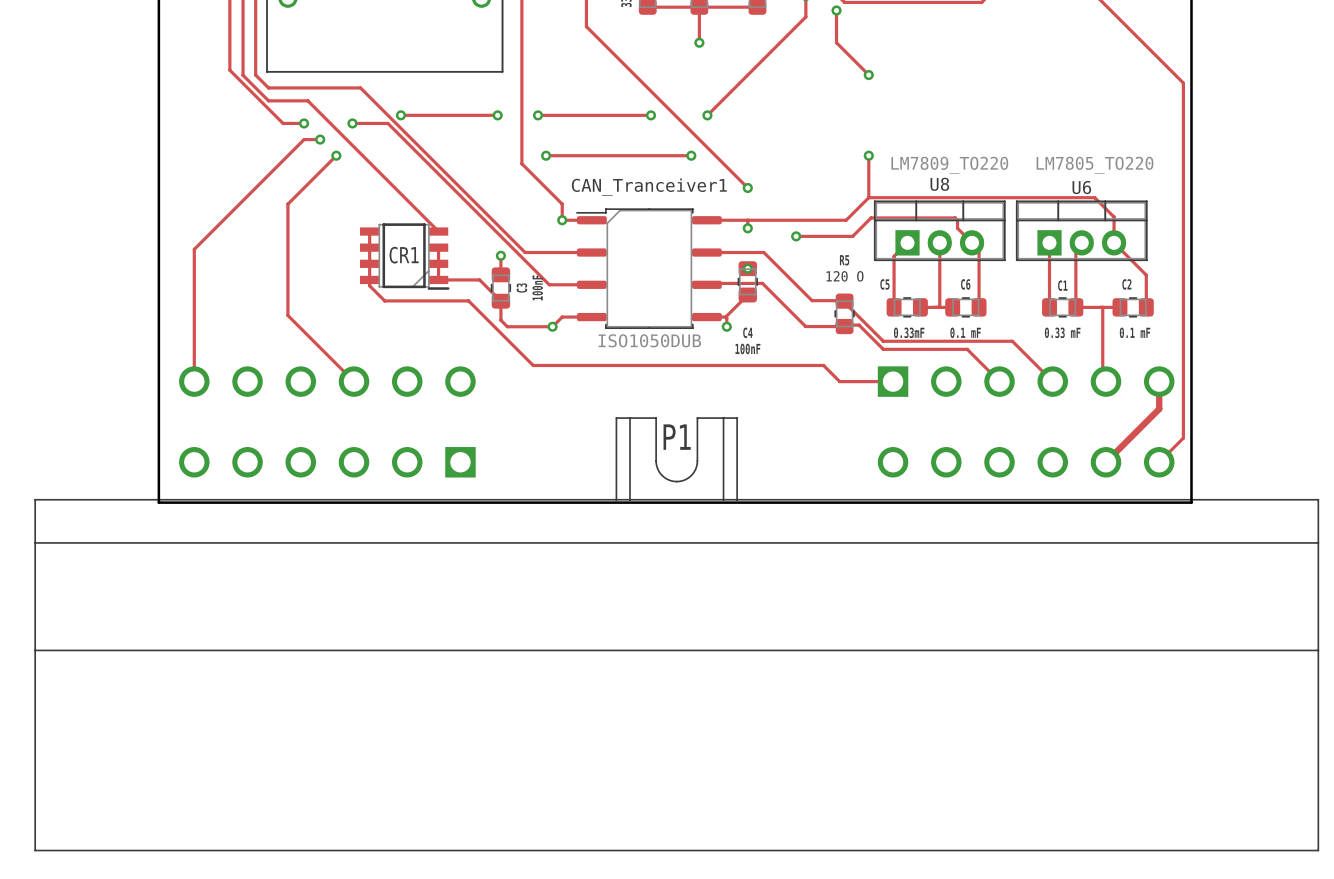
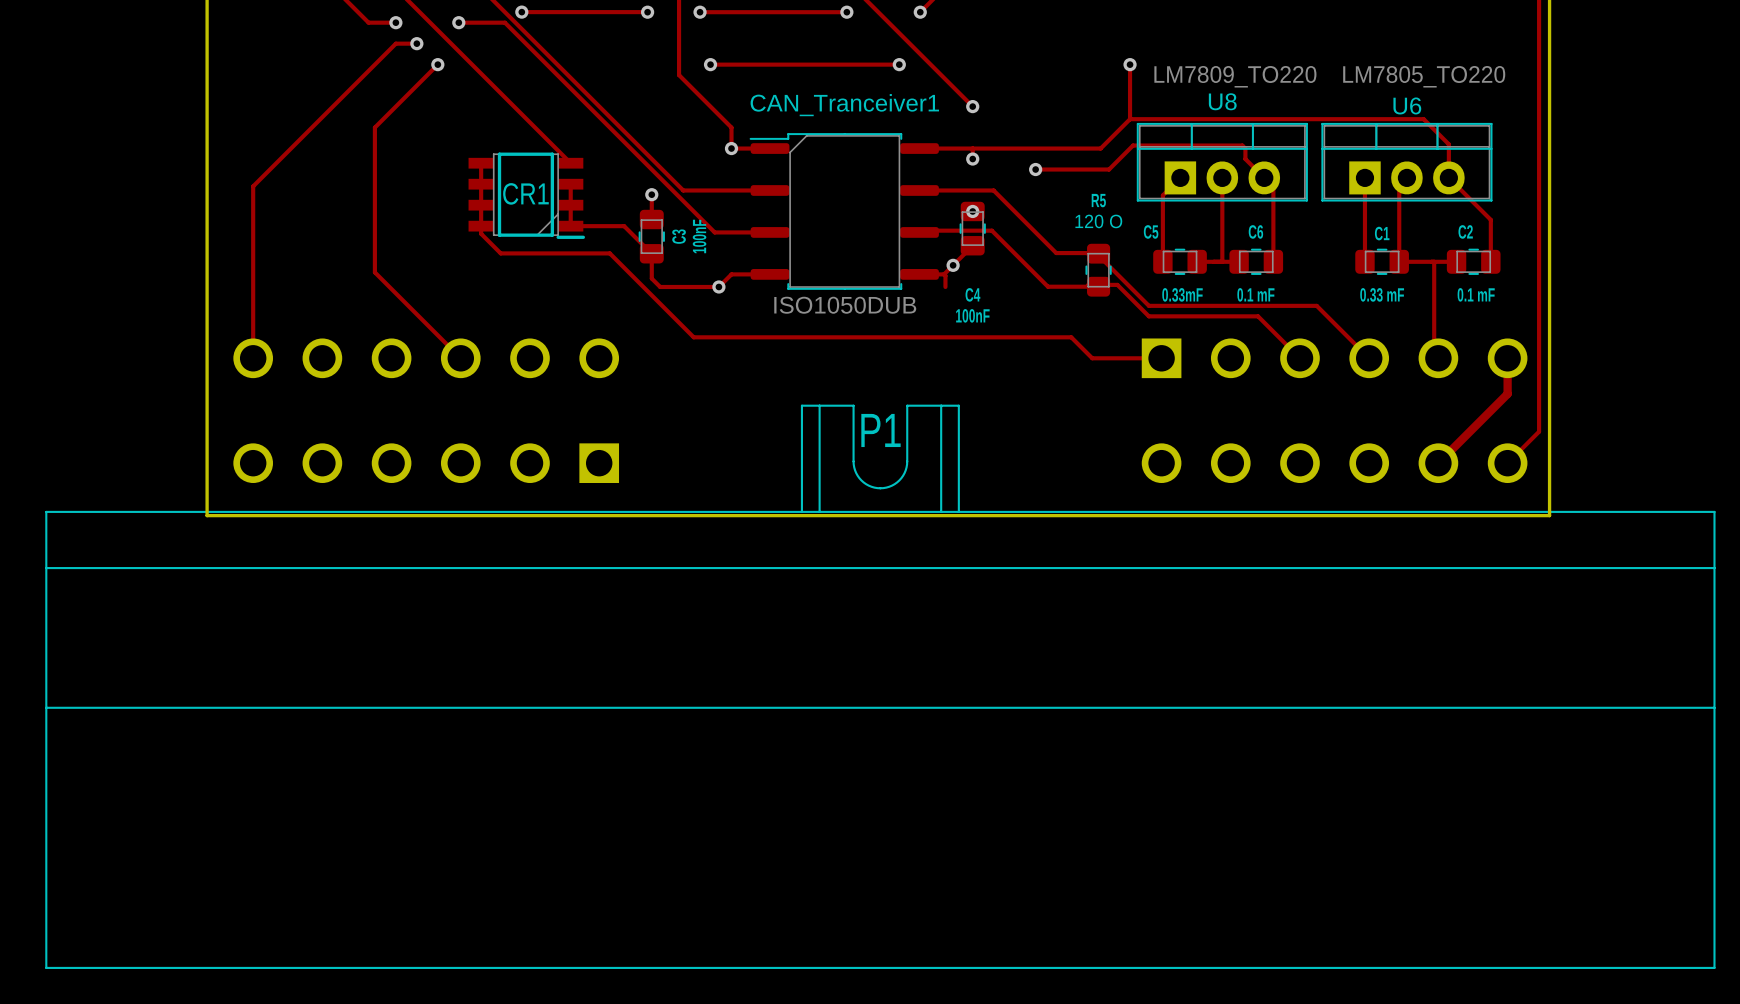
via position: (726, 326) -> (953, 265)

